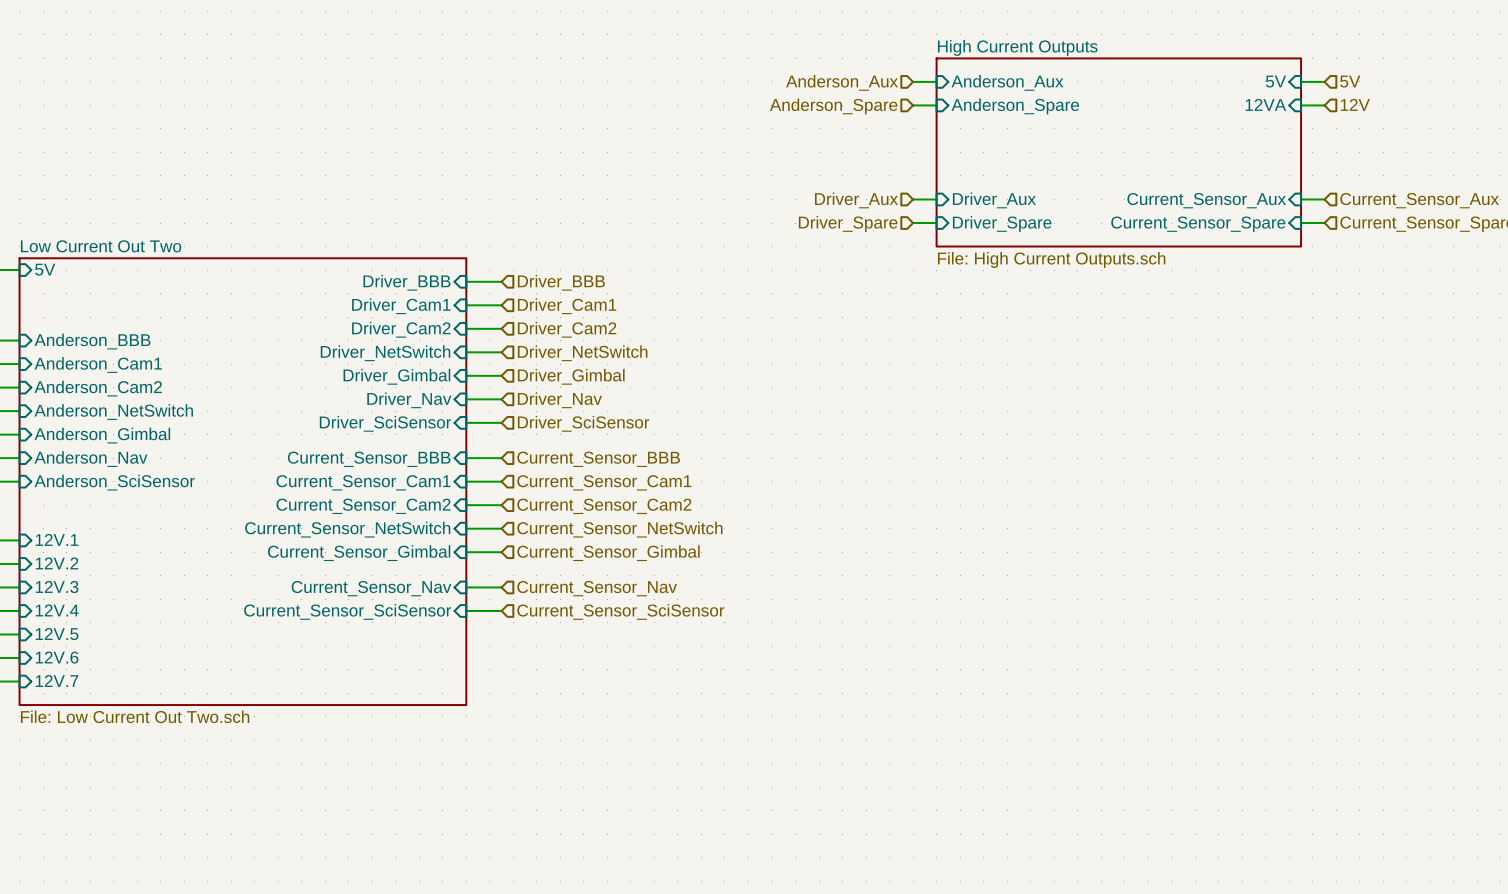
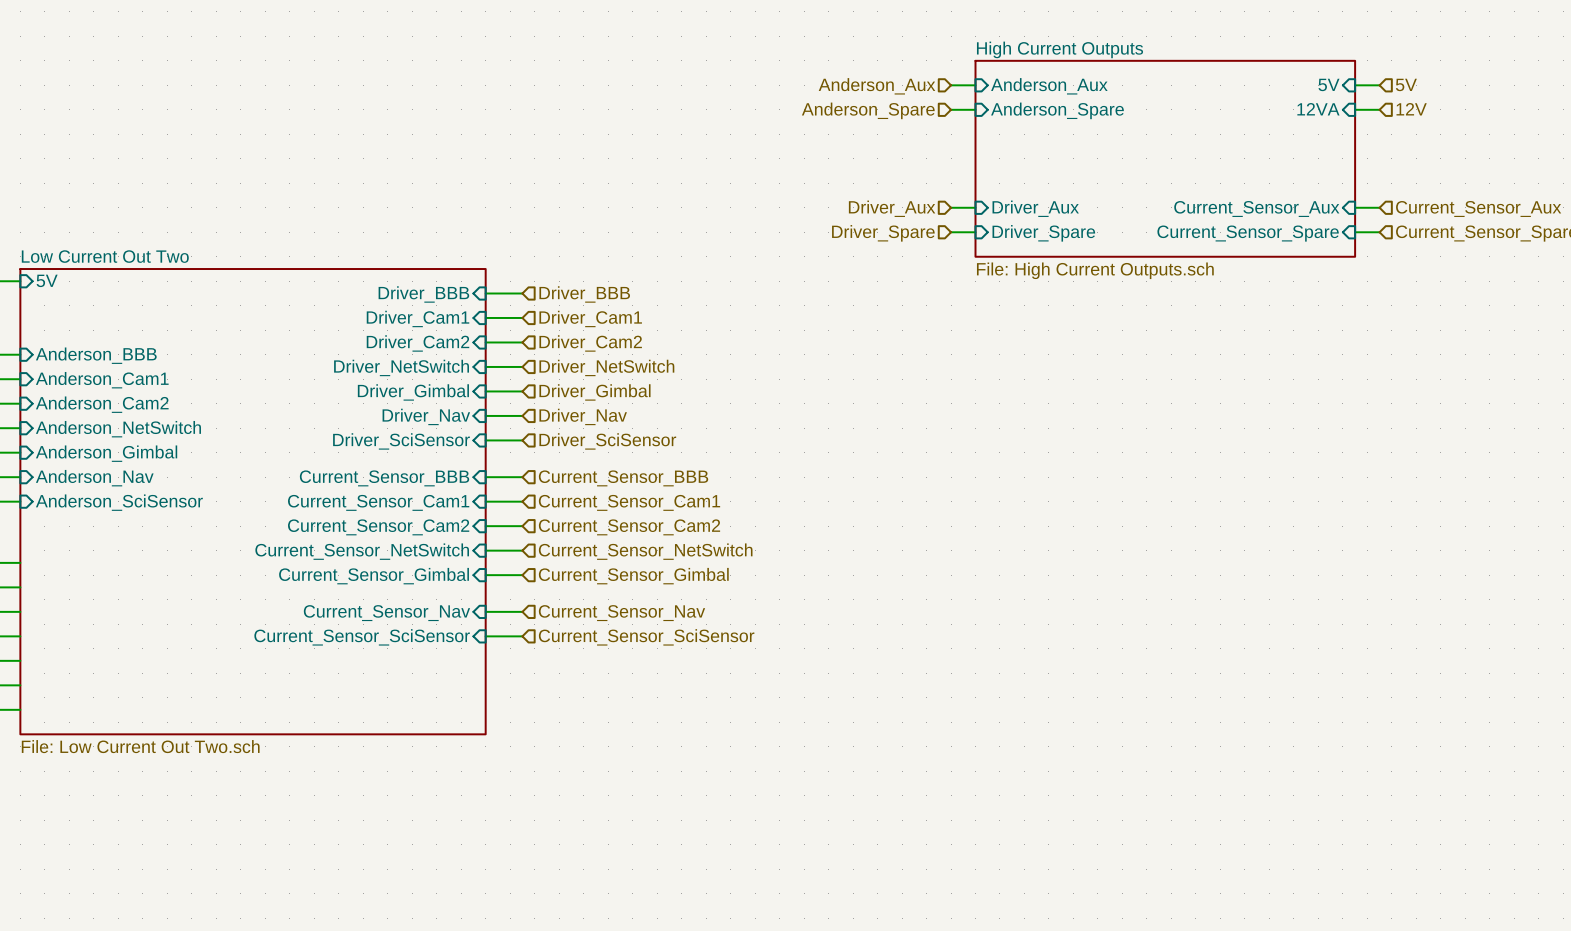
sheet pin: 12V.1 (57, 539) -> none
sheet pin: 12V.2 (57, 563) -> none
sheet pin: 12V.3 (57, 587) -> none
sheet pin: 12V.4 (57, 610) -> none
sheet pin: 12V.5 (57, 634) -> none
sheet pin: 12V.6 (57, 657) -> none
sheet pin: 12V.7 (57, 681) -> none

